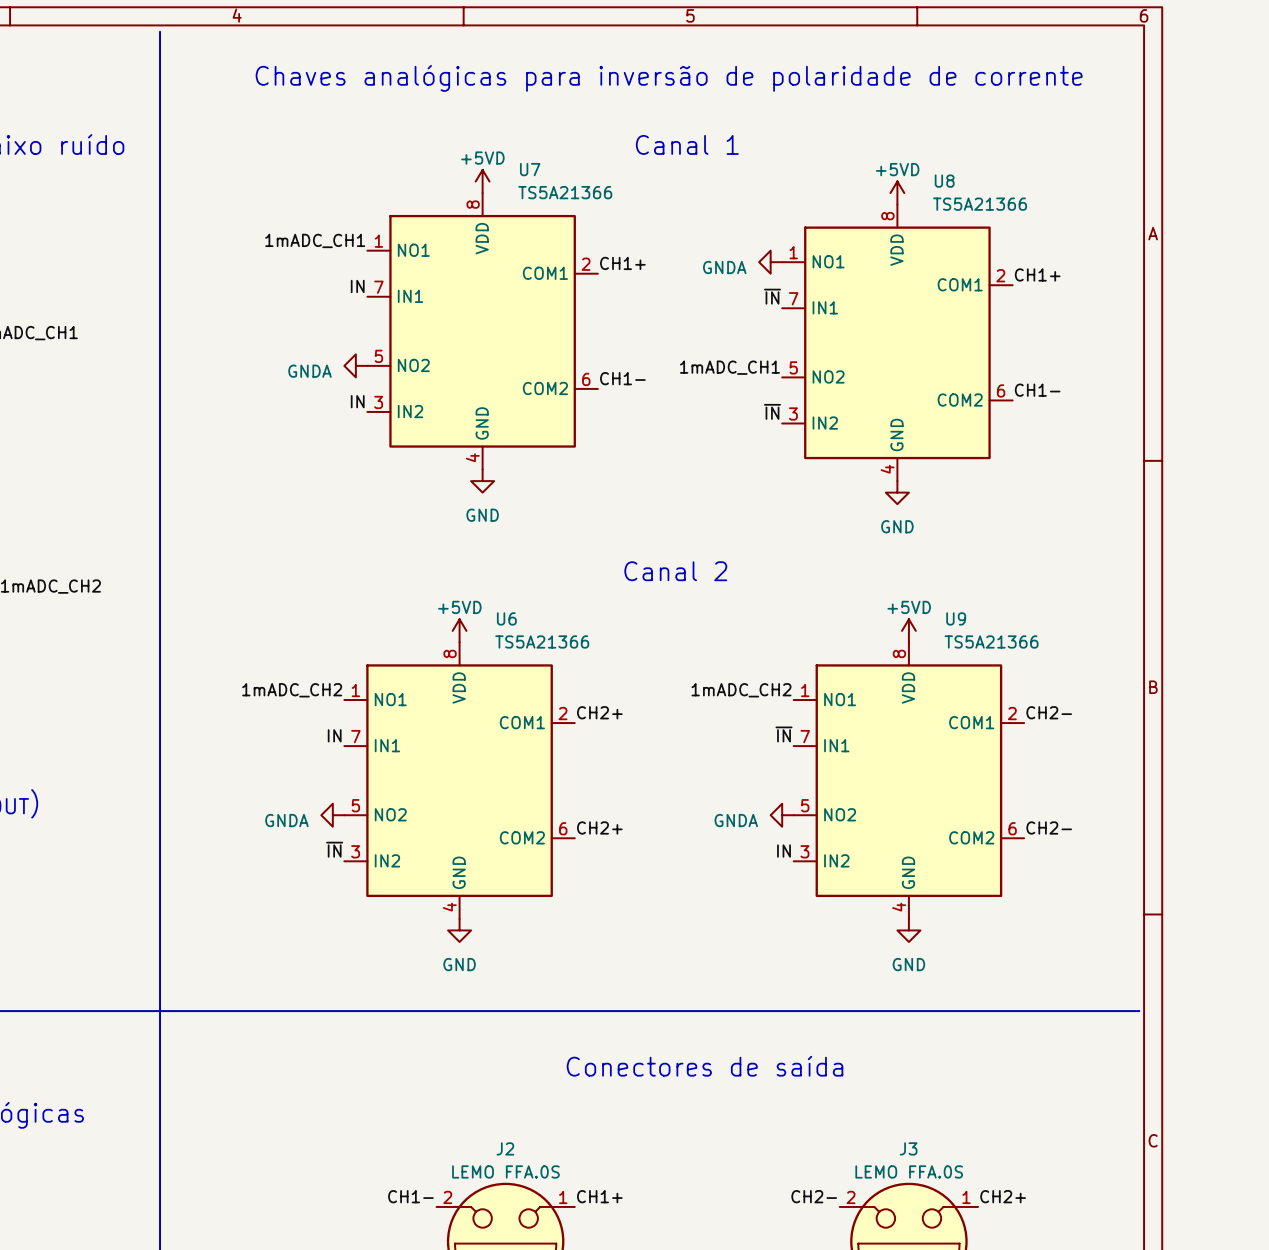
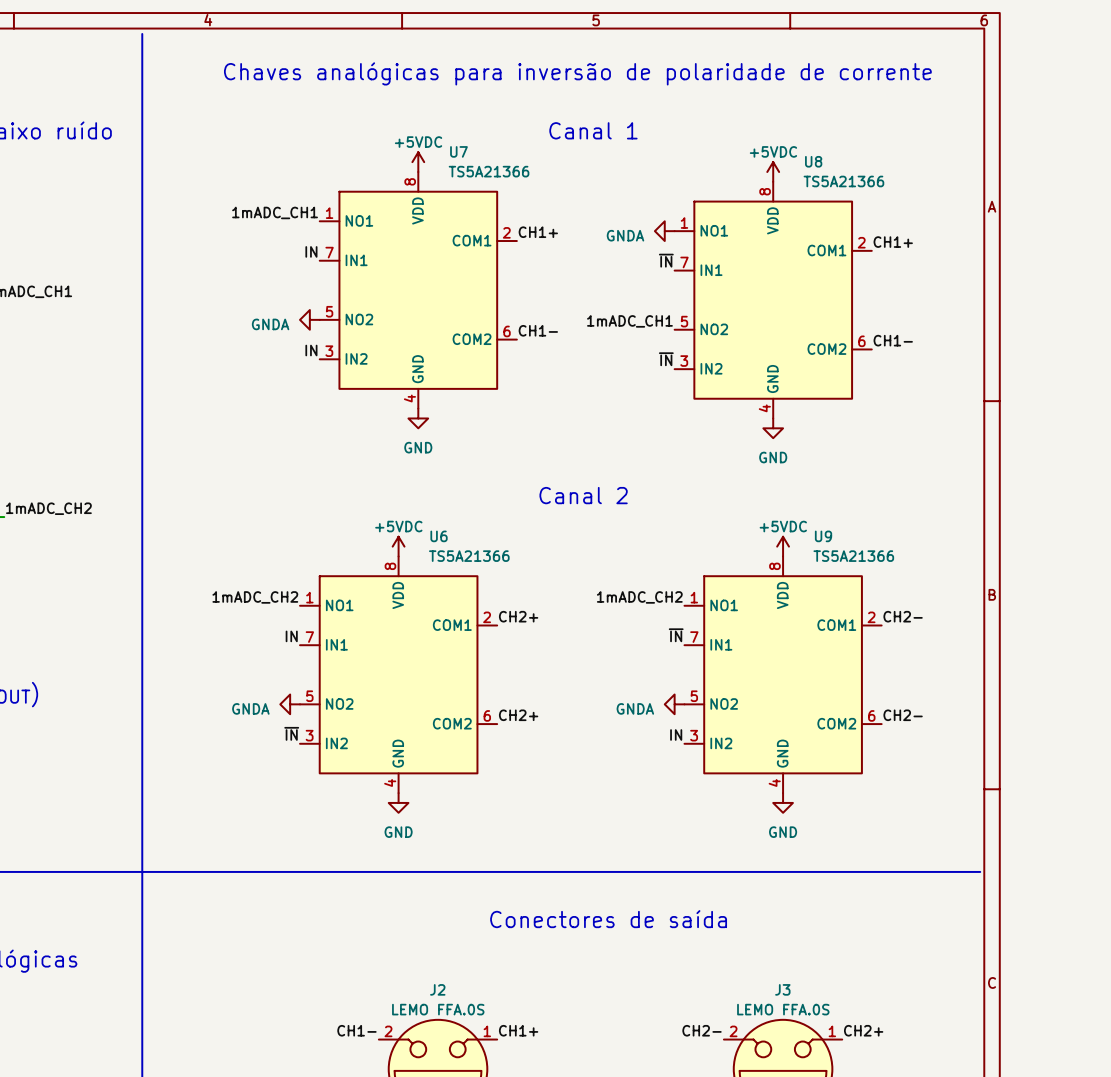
power symbol: +5VD (482, 181) -> +5VDC (418, 162)
power symbol: +5VD (897, 193) -> +5VDC (773, 172)
power symbol: +5VD (459, 630) -> +5VDC (398, 546)
power symbol: +5VD (908, 630) -> +5VDC (783, 546)

